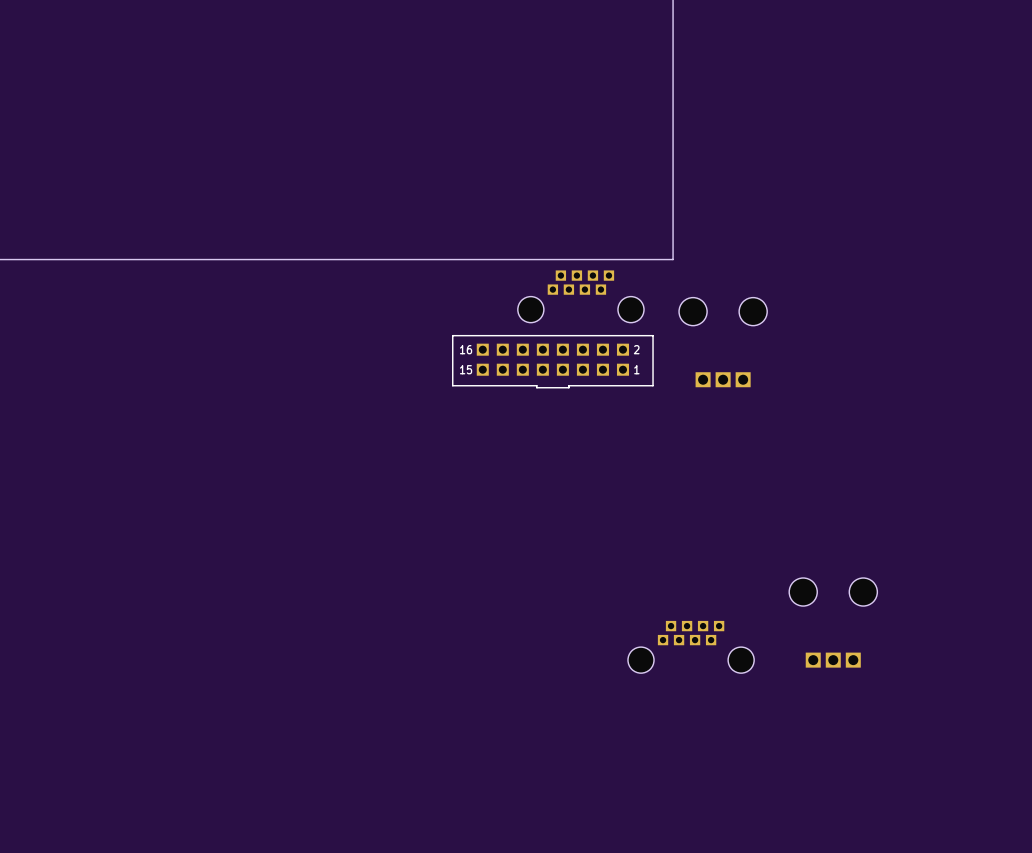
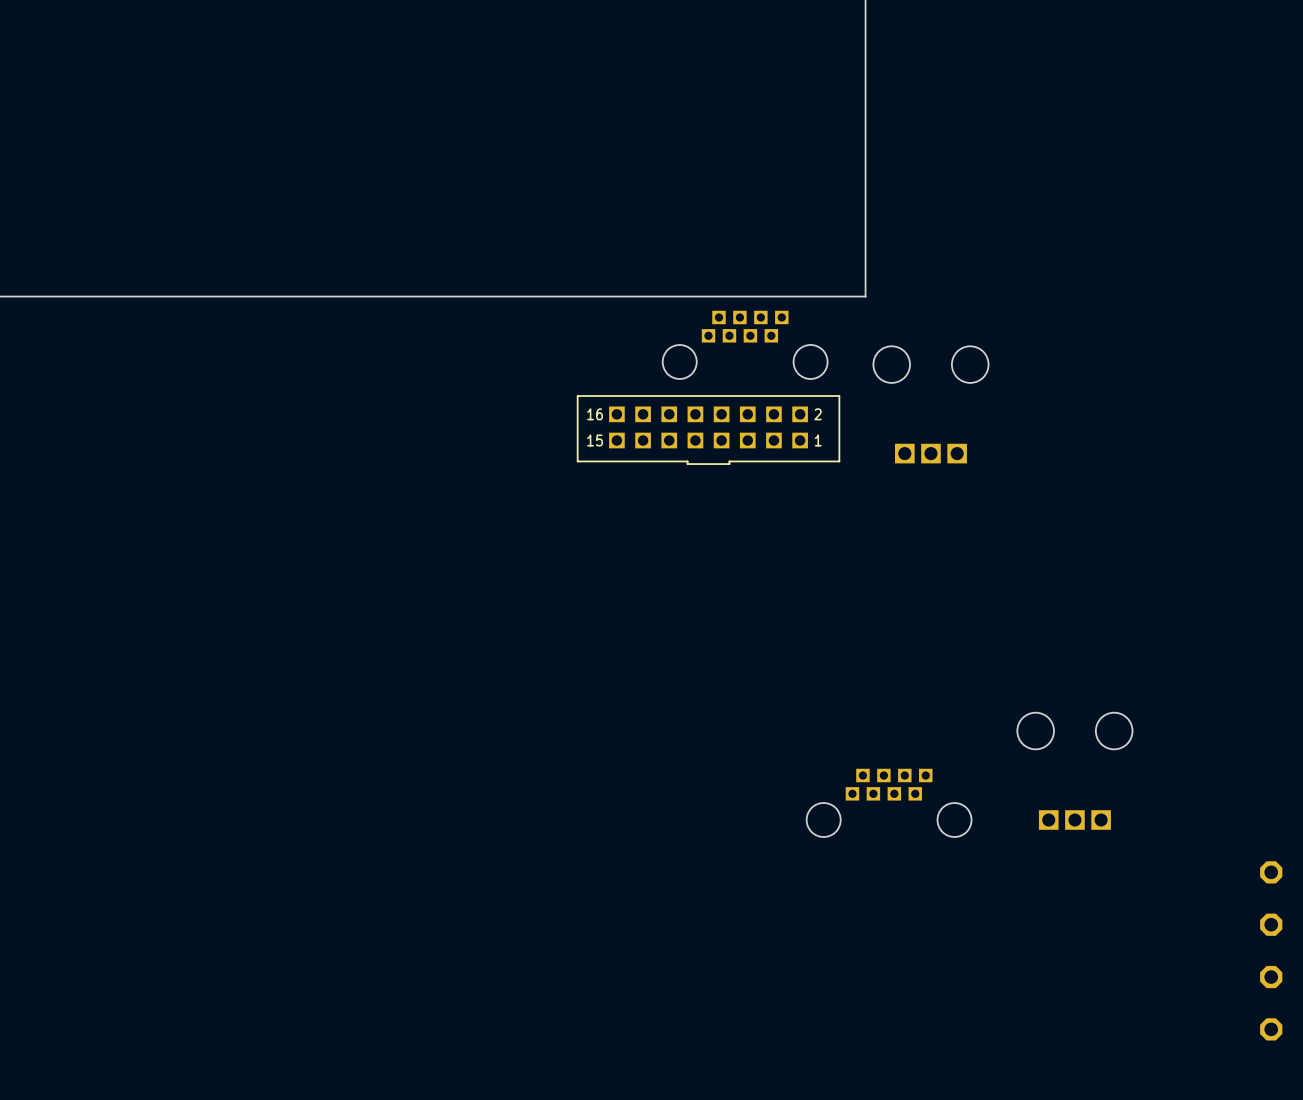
part: none -> (1271, 872)
part: none -> (1271, 924)
part: none -> (1271, 977)
part: none -> (1271, 1029)

